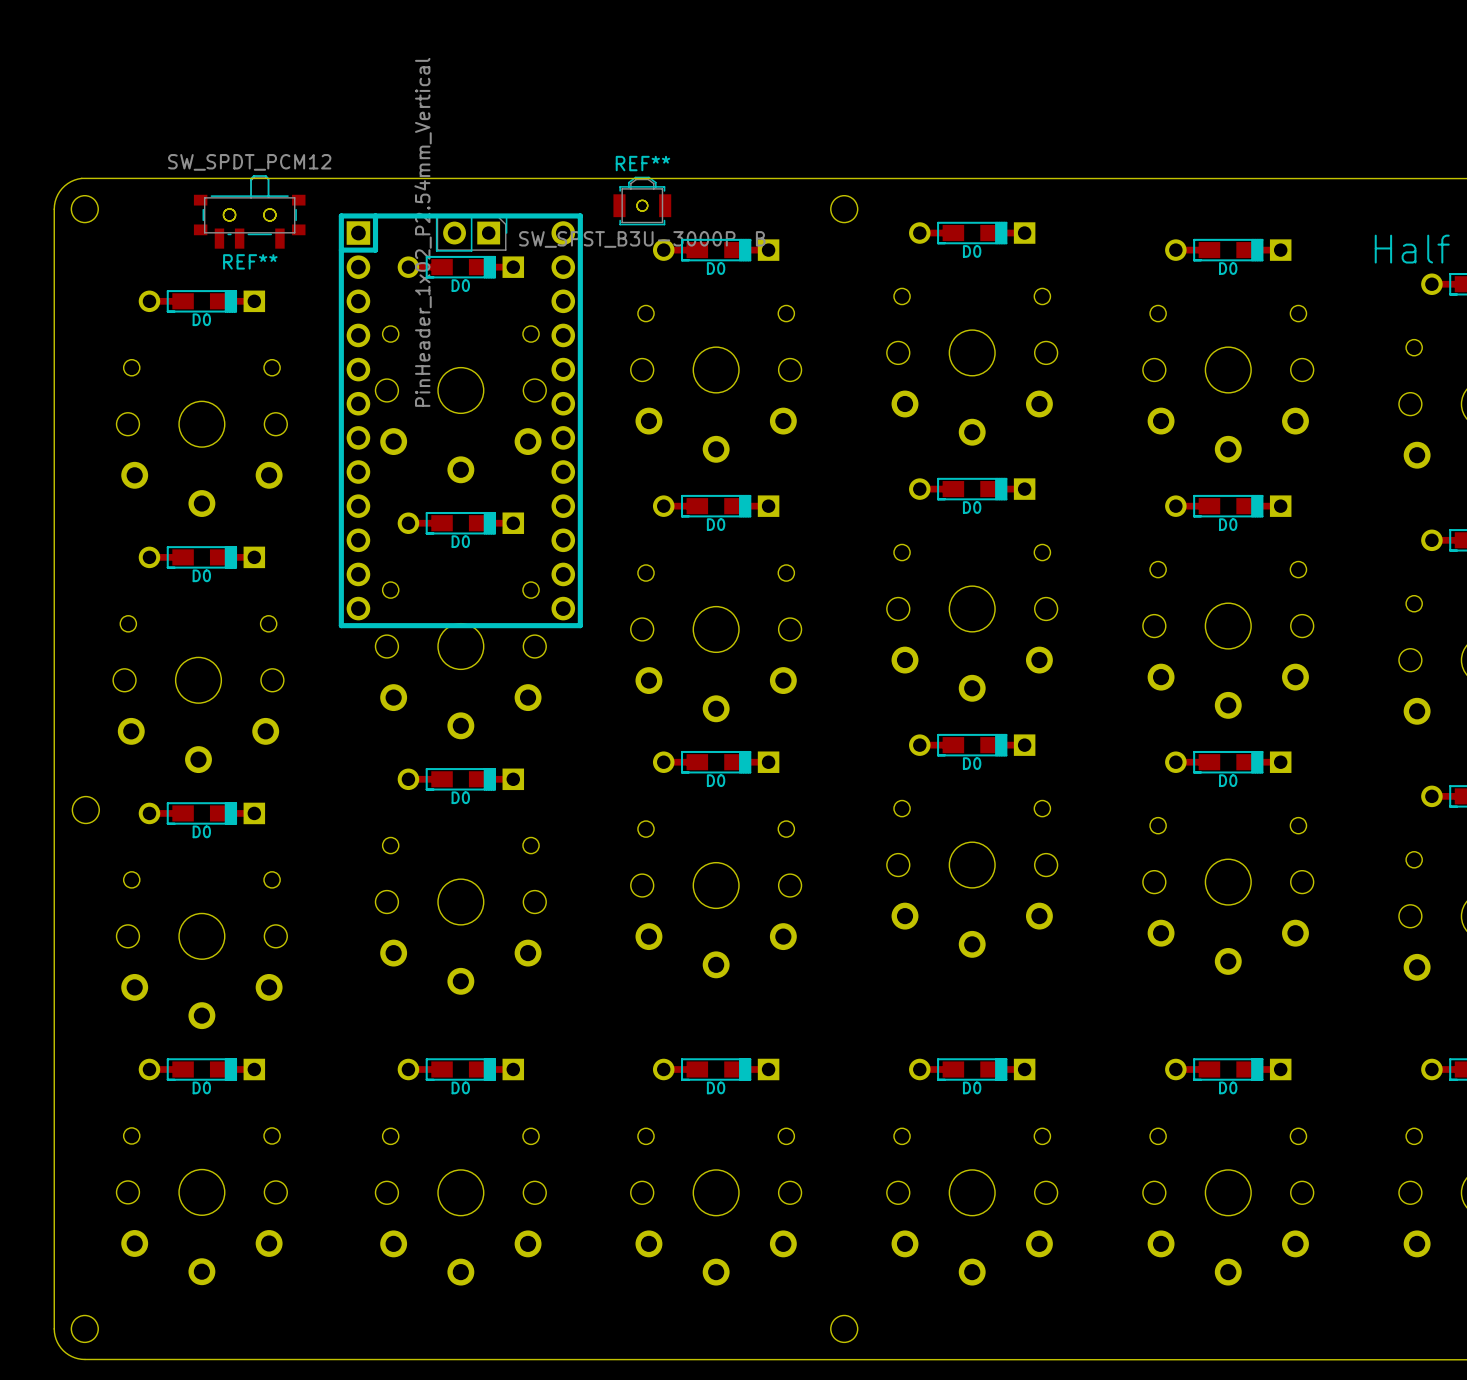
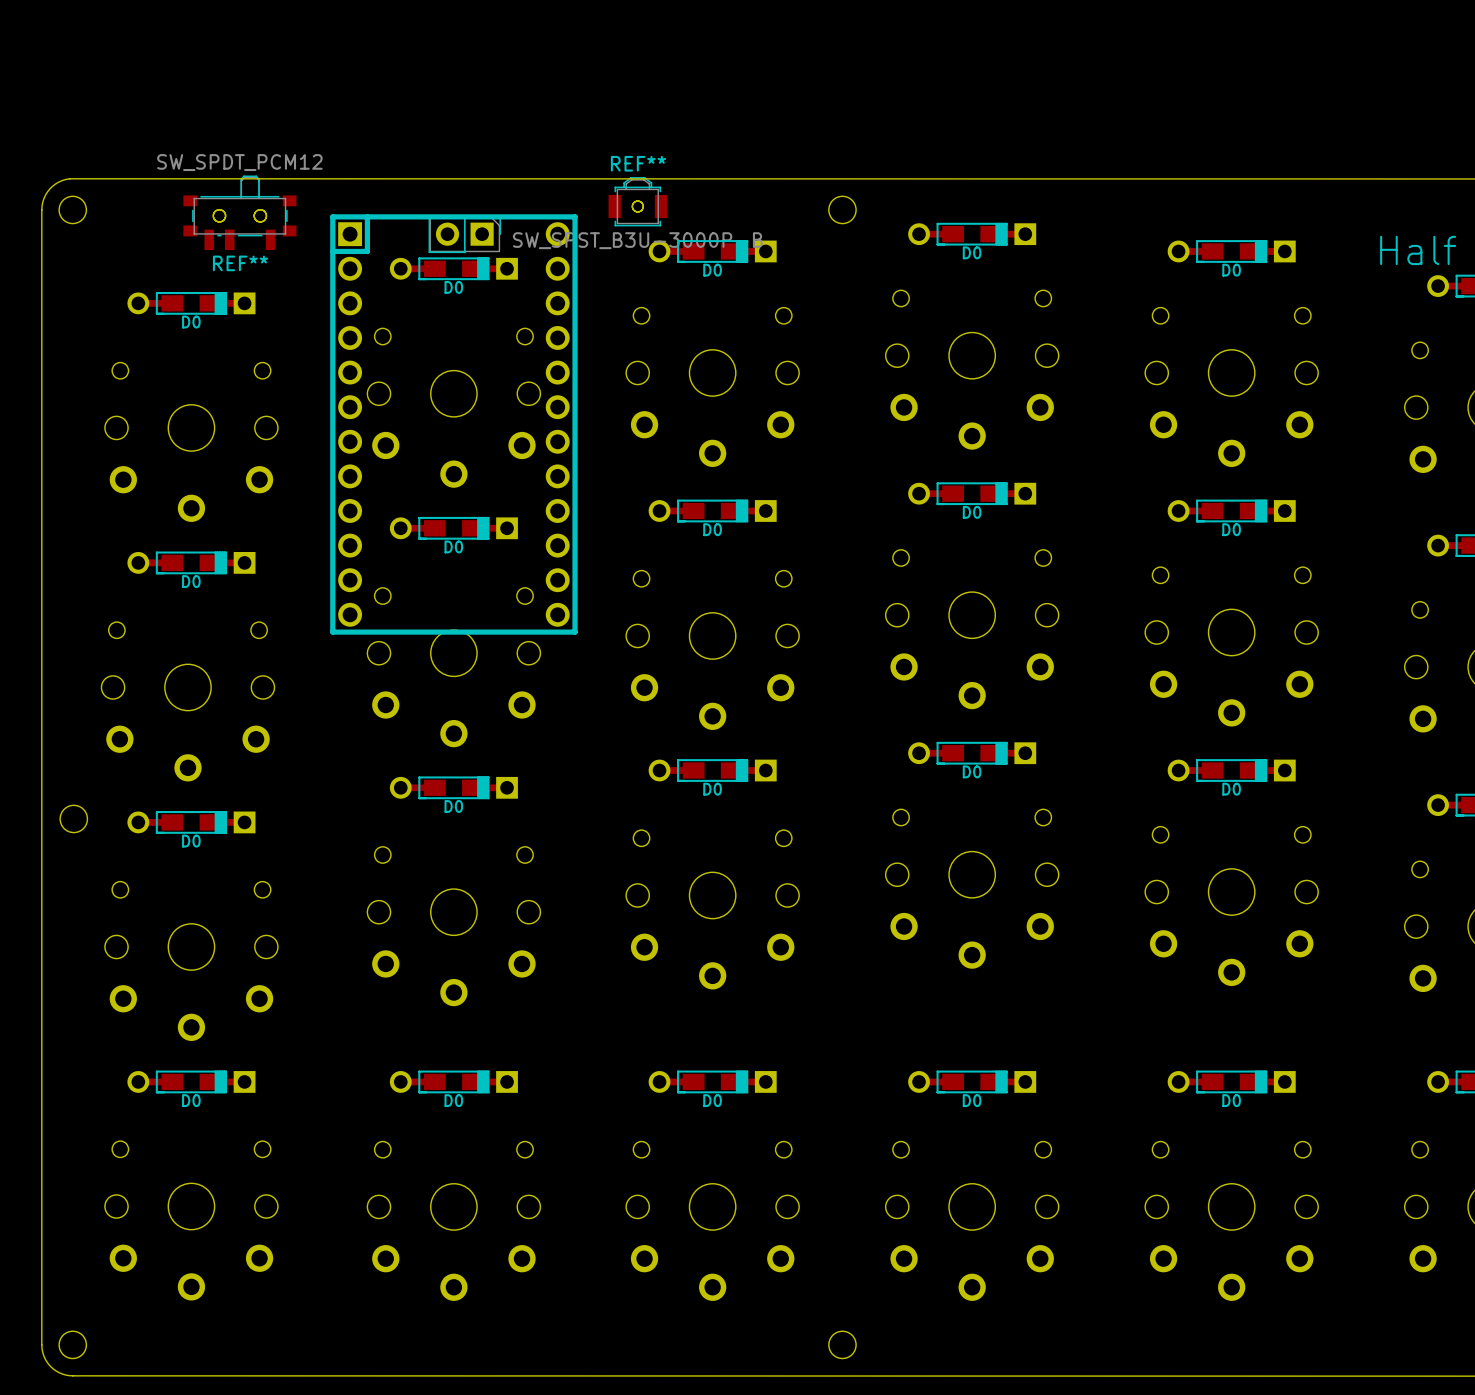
part value: PinHeader_1x02_P2.54mm_Vertical (423, 232) -> none

